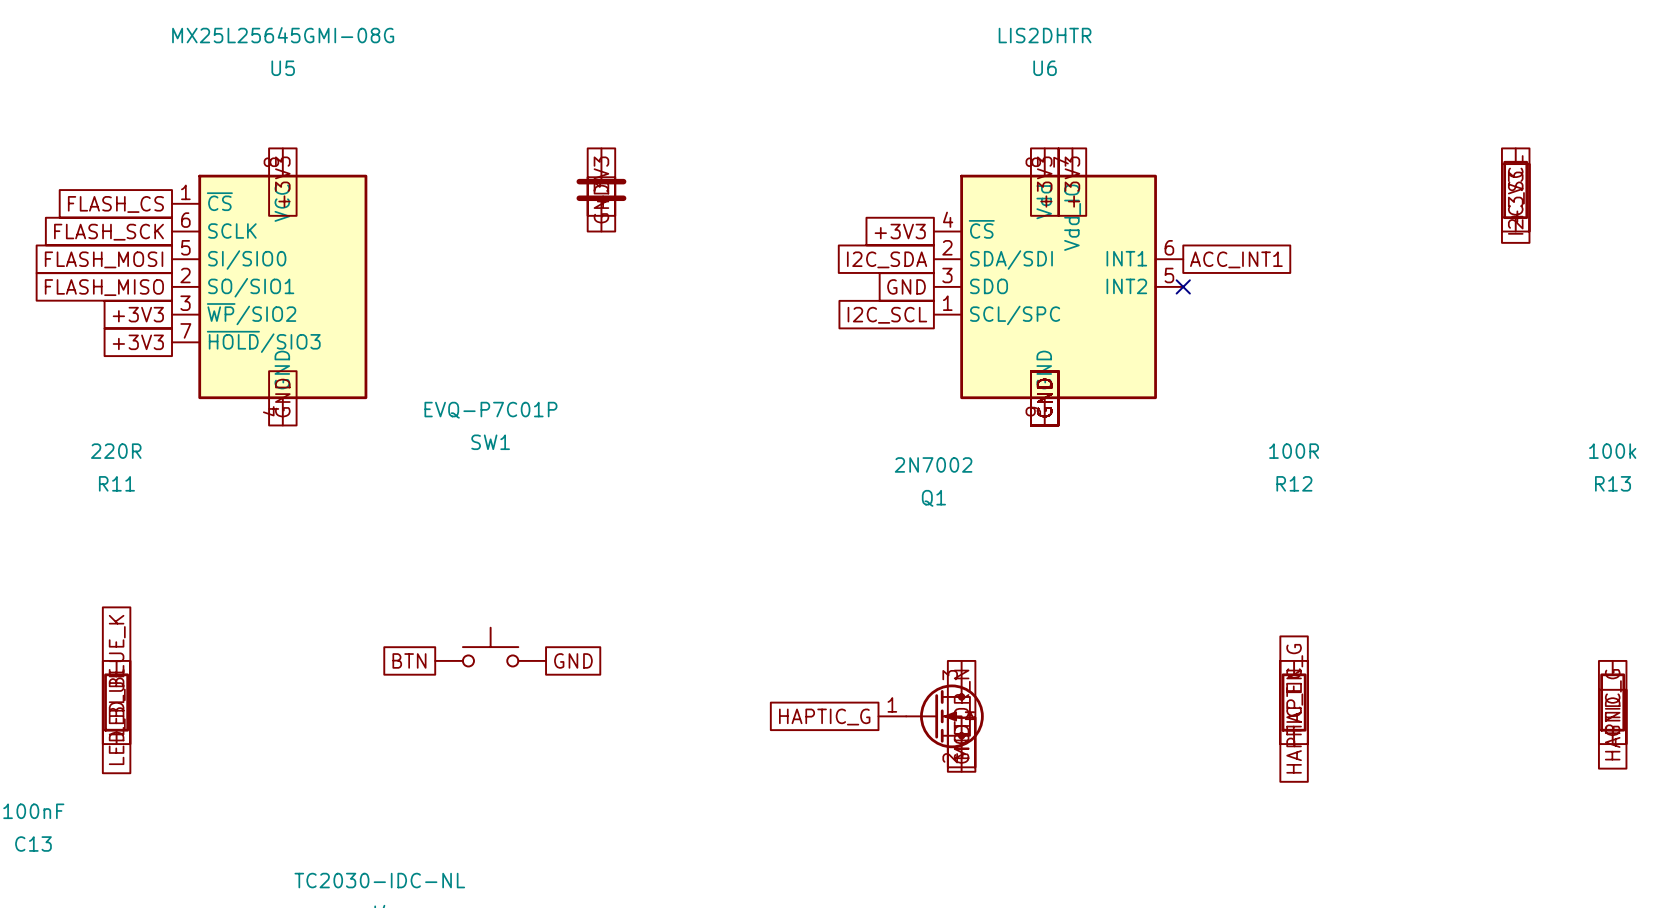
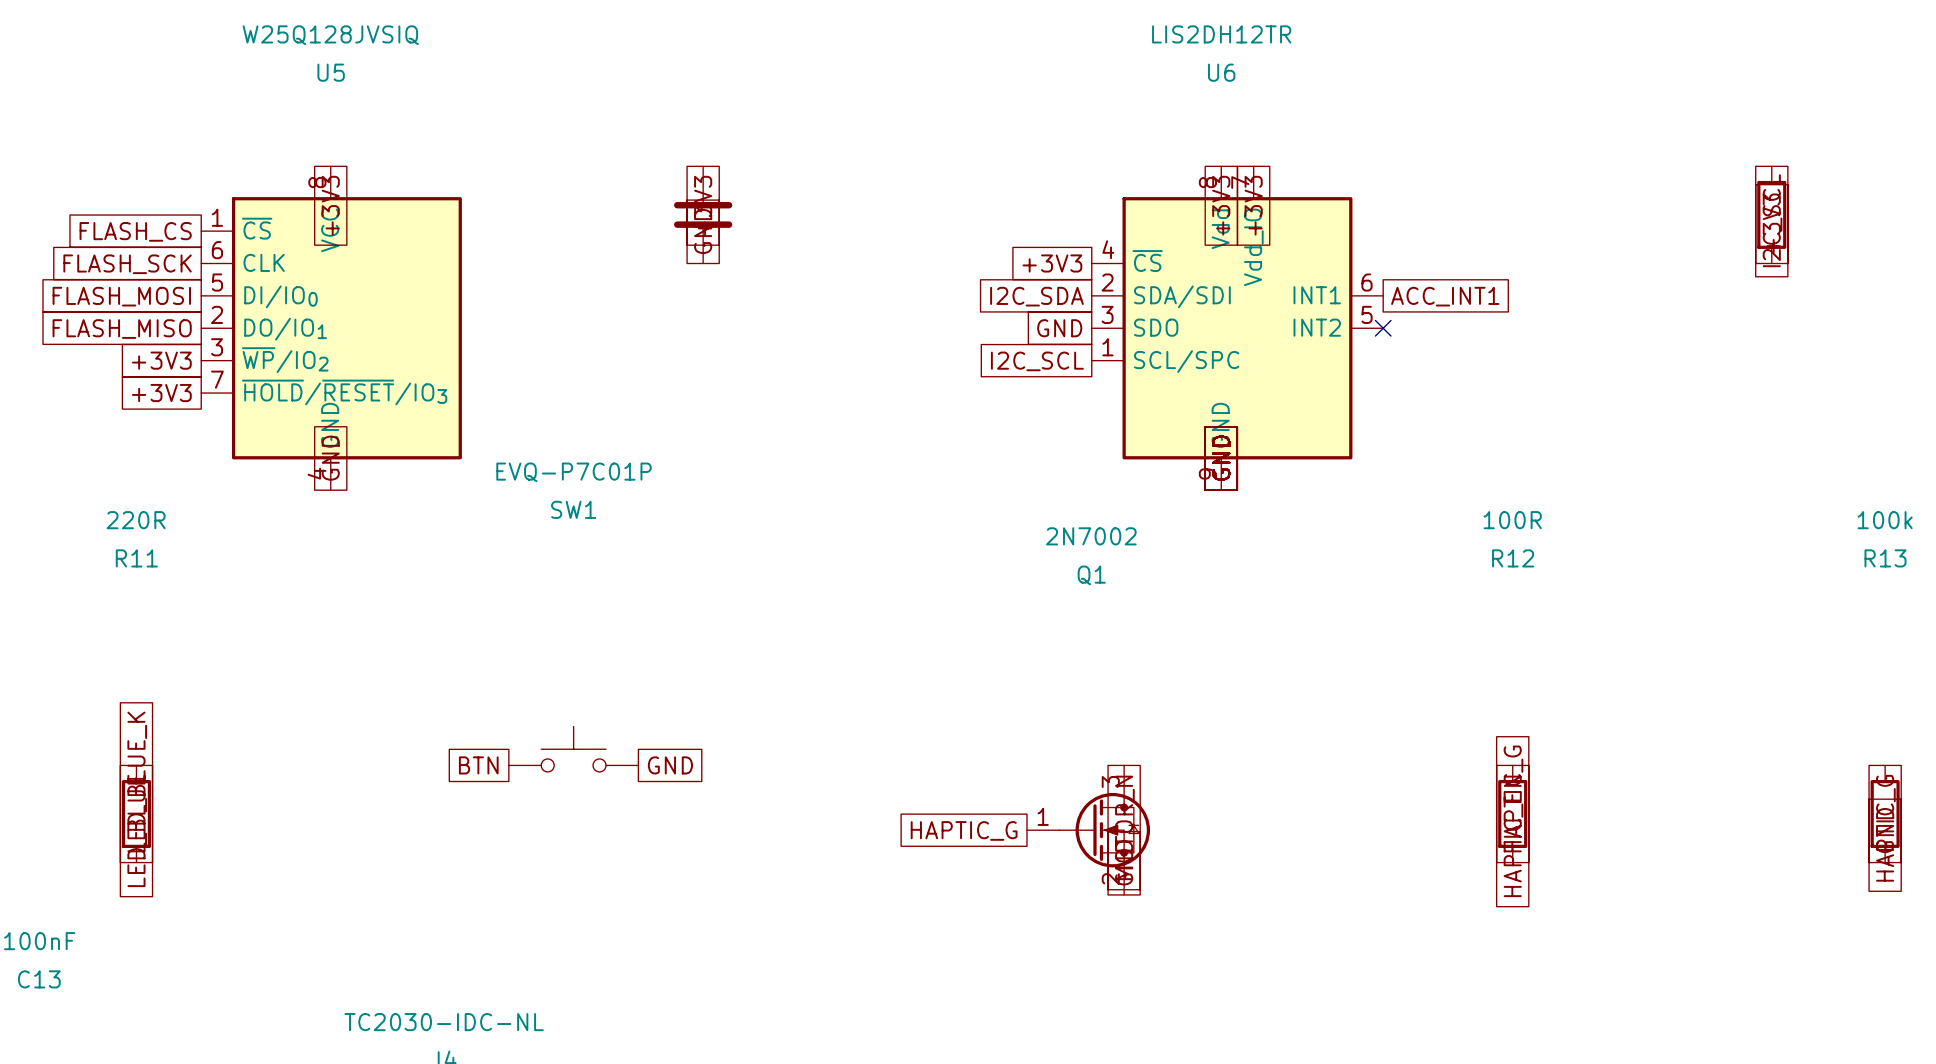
U5 value: MX25L25645GMI-08G (283, 35) -> W25Q128JVSIQ (330, 35)
U6 value: LIS2DHTR (1045, 35) -> LIS2DH12TR (1221, 34)
U5 symbol: [172, 148, 368, 426] -> [201, 166, 462, 491]

